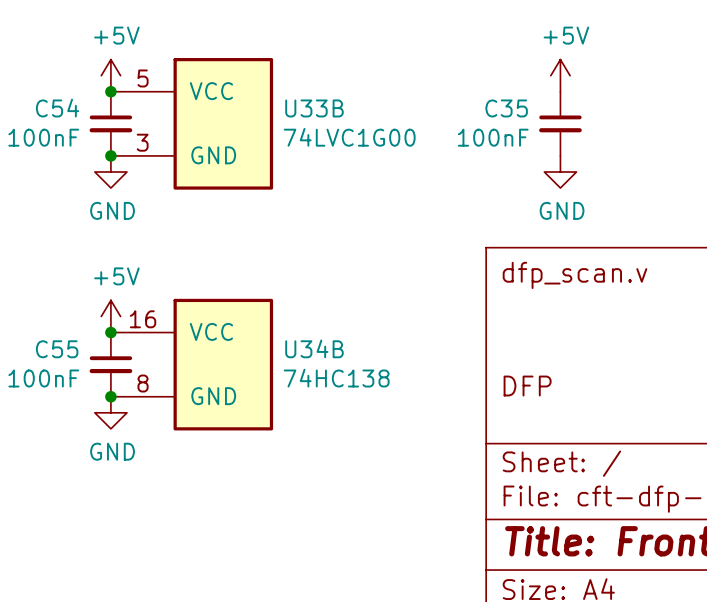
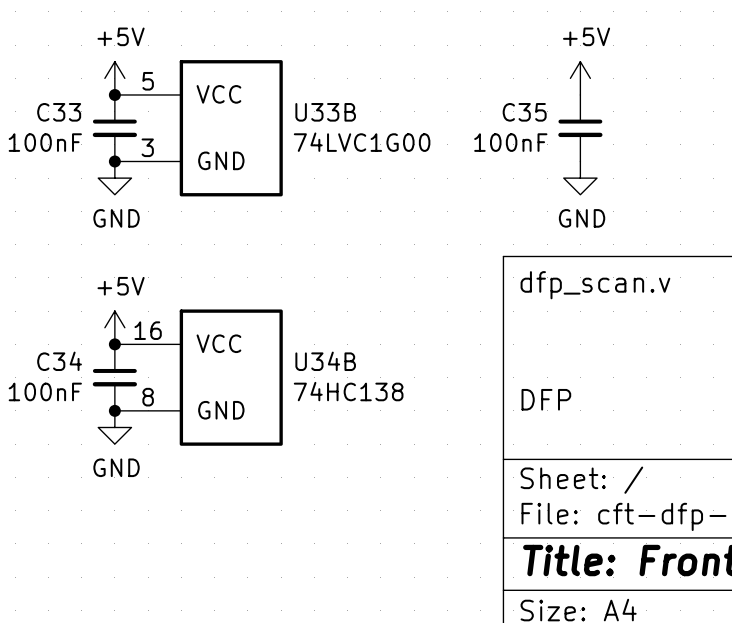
C54 name: C54 (57, 108) -> C33 (59, 112)
C55 name: C55 (57, 349) -> C34 (59, 361)

